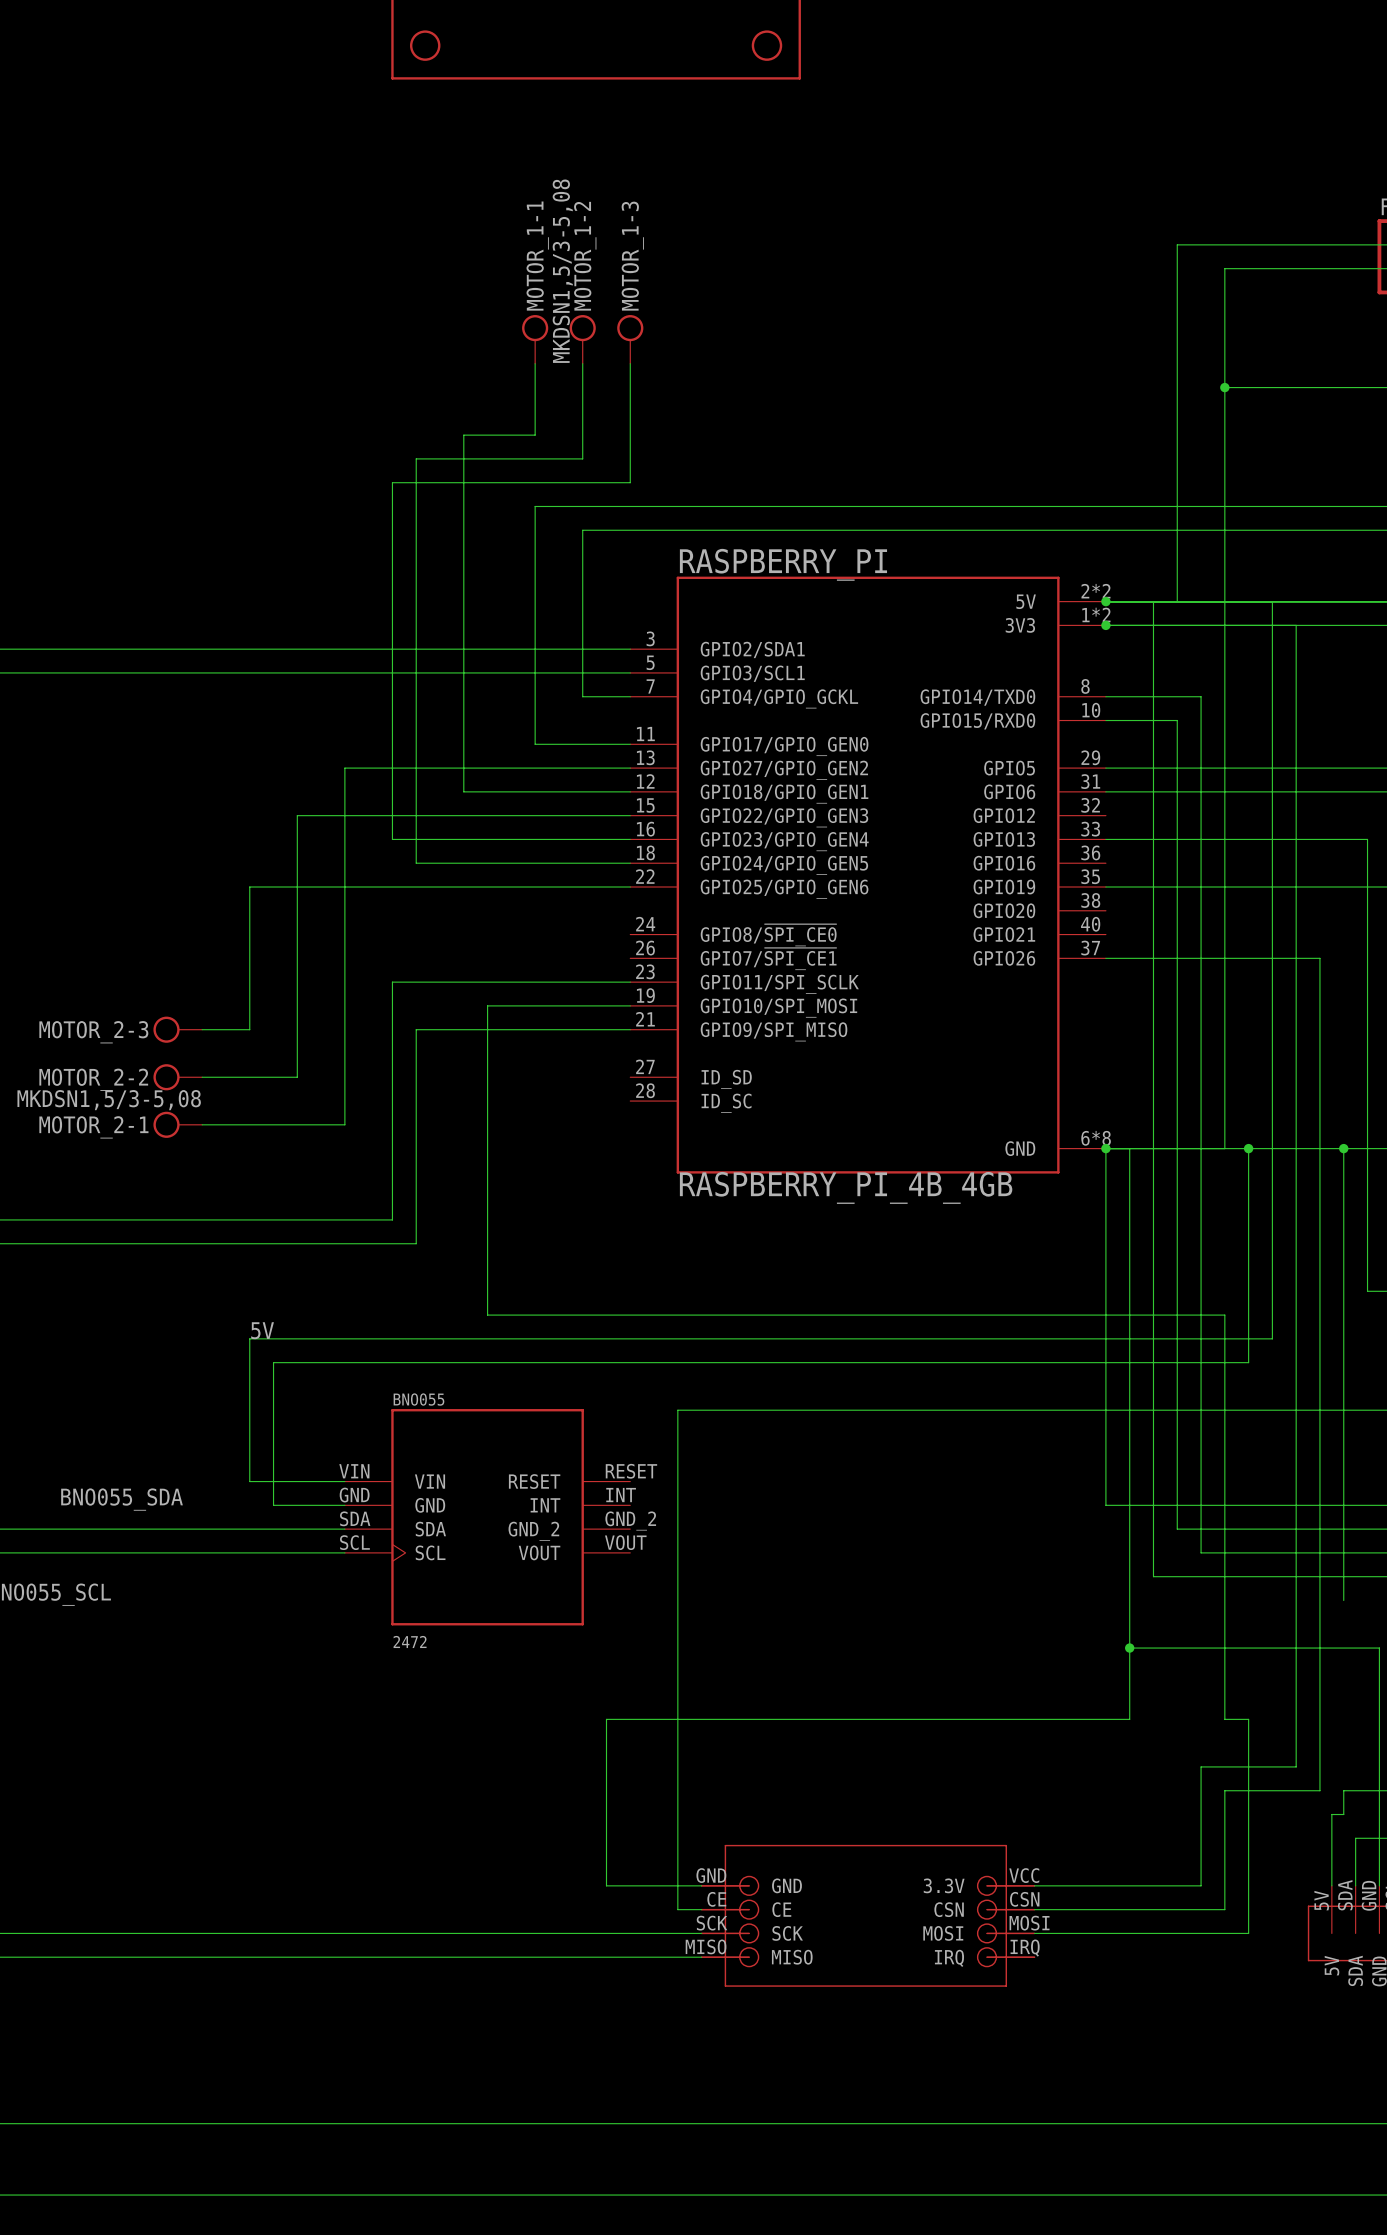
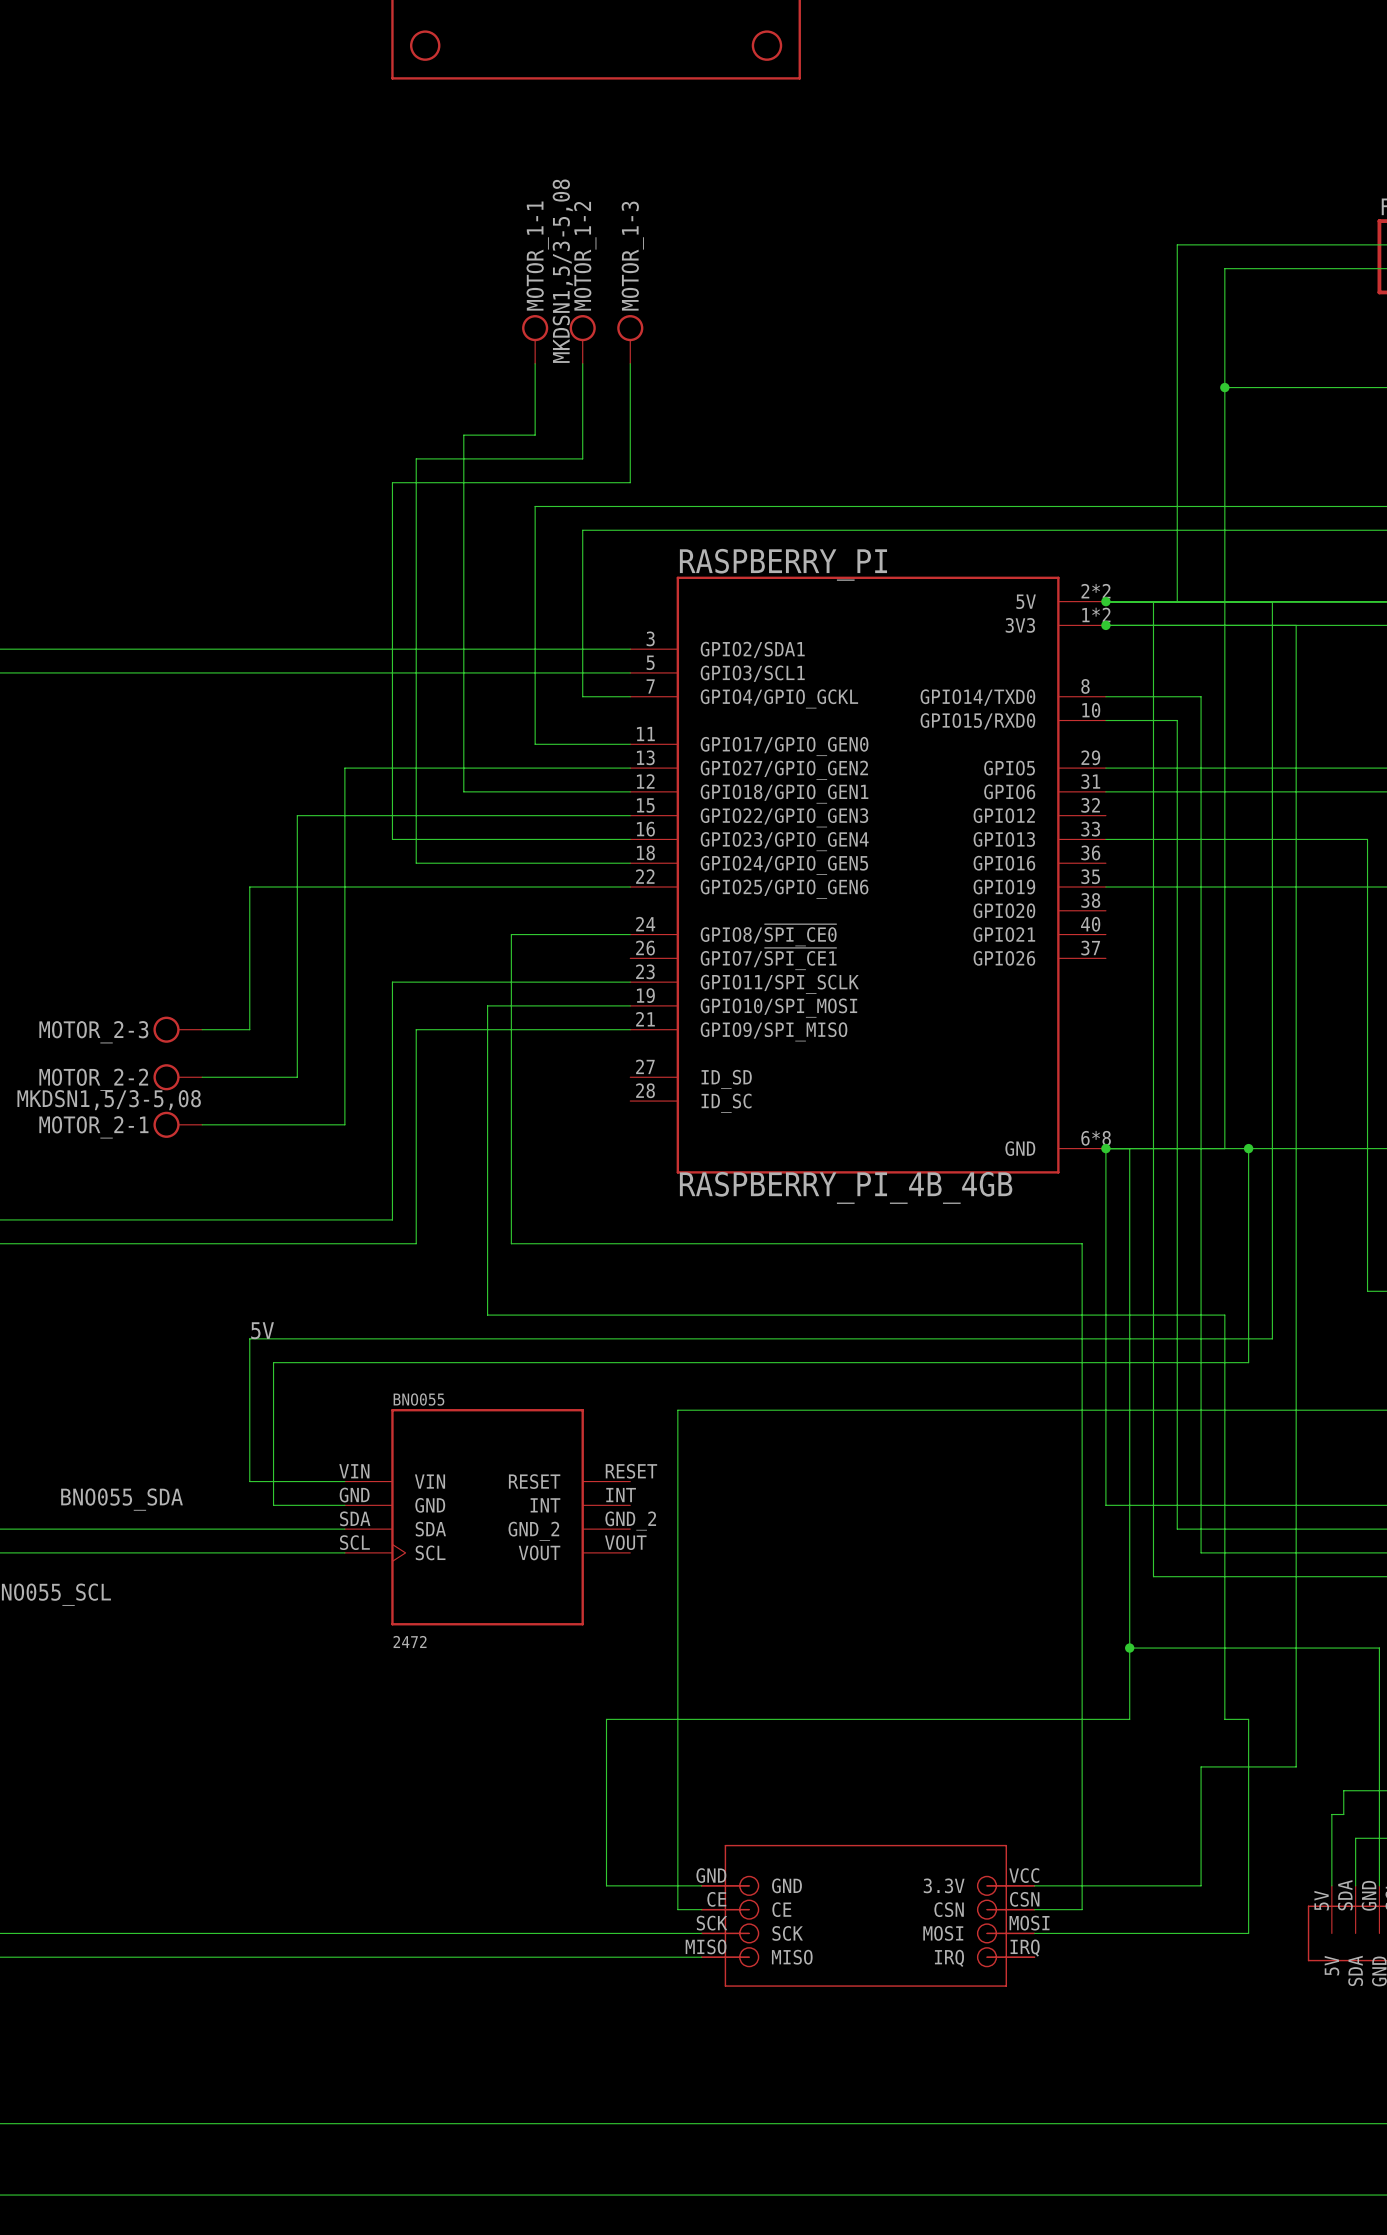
wire: (1105, 958) (1319, 958) (1319, 1790) (1224, 1790) (1224, 1909) (1082, 1909) -> (630, 934) (511, 934) (511, 1243) (1082, 1243) (1082, 1909)
wire: (1343, 1148) (1343, 1600) -> none
junction: (1343, 1148) -> none

